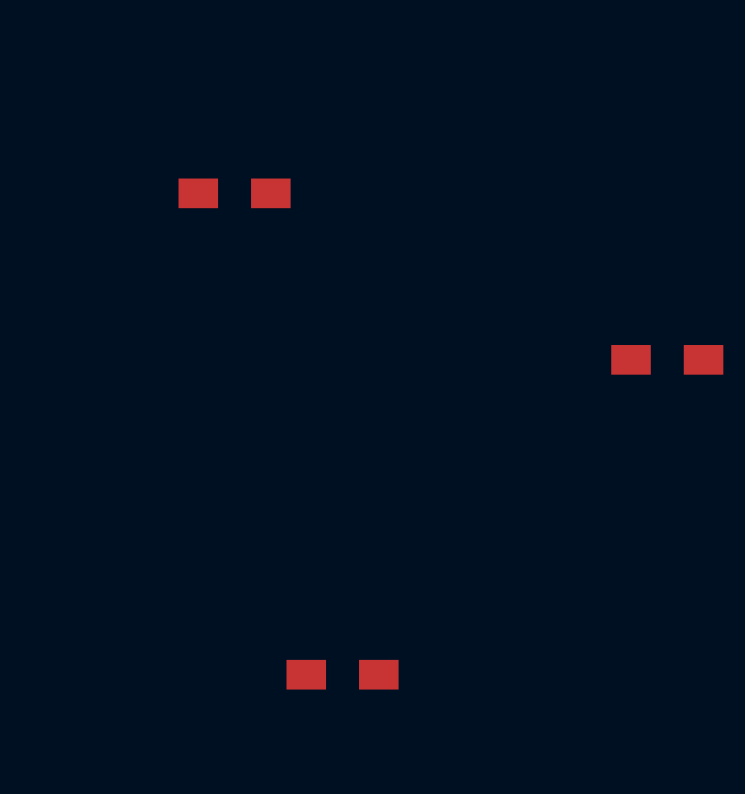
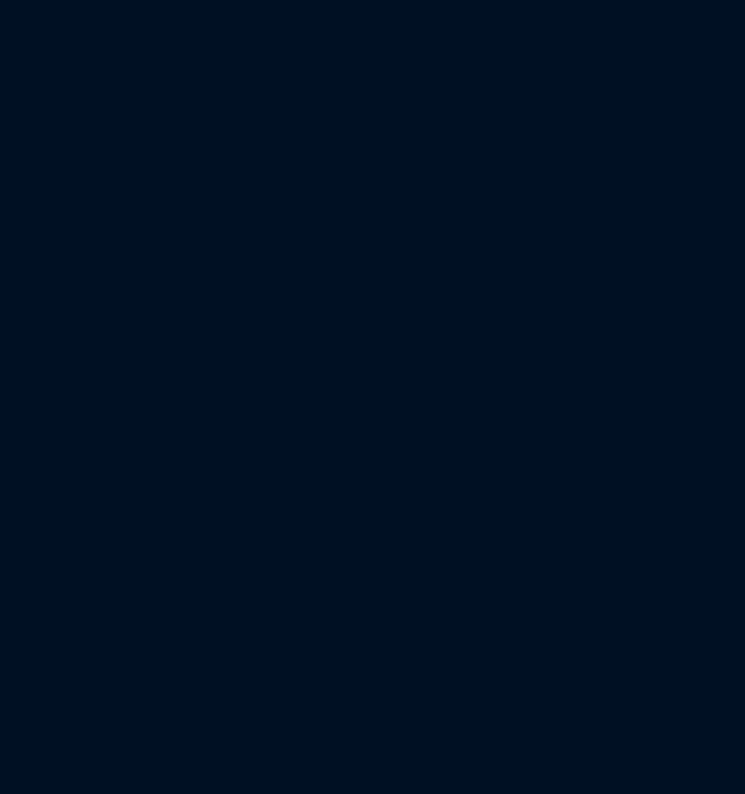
part: (234, 193) -> none
part: (667, 359) -> none
part: (342, 674) -> none

